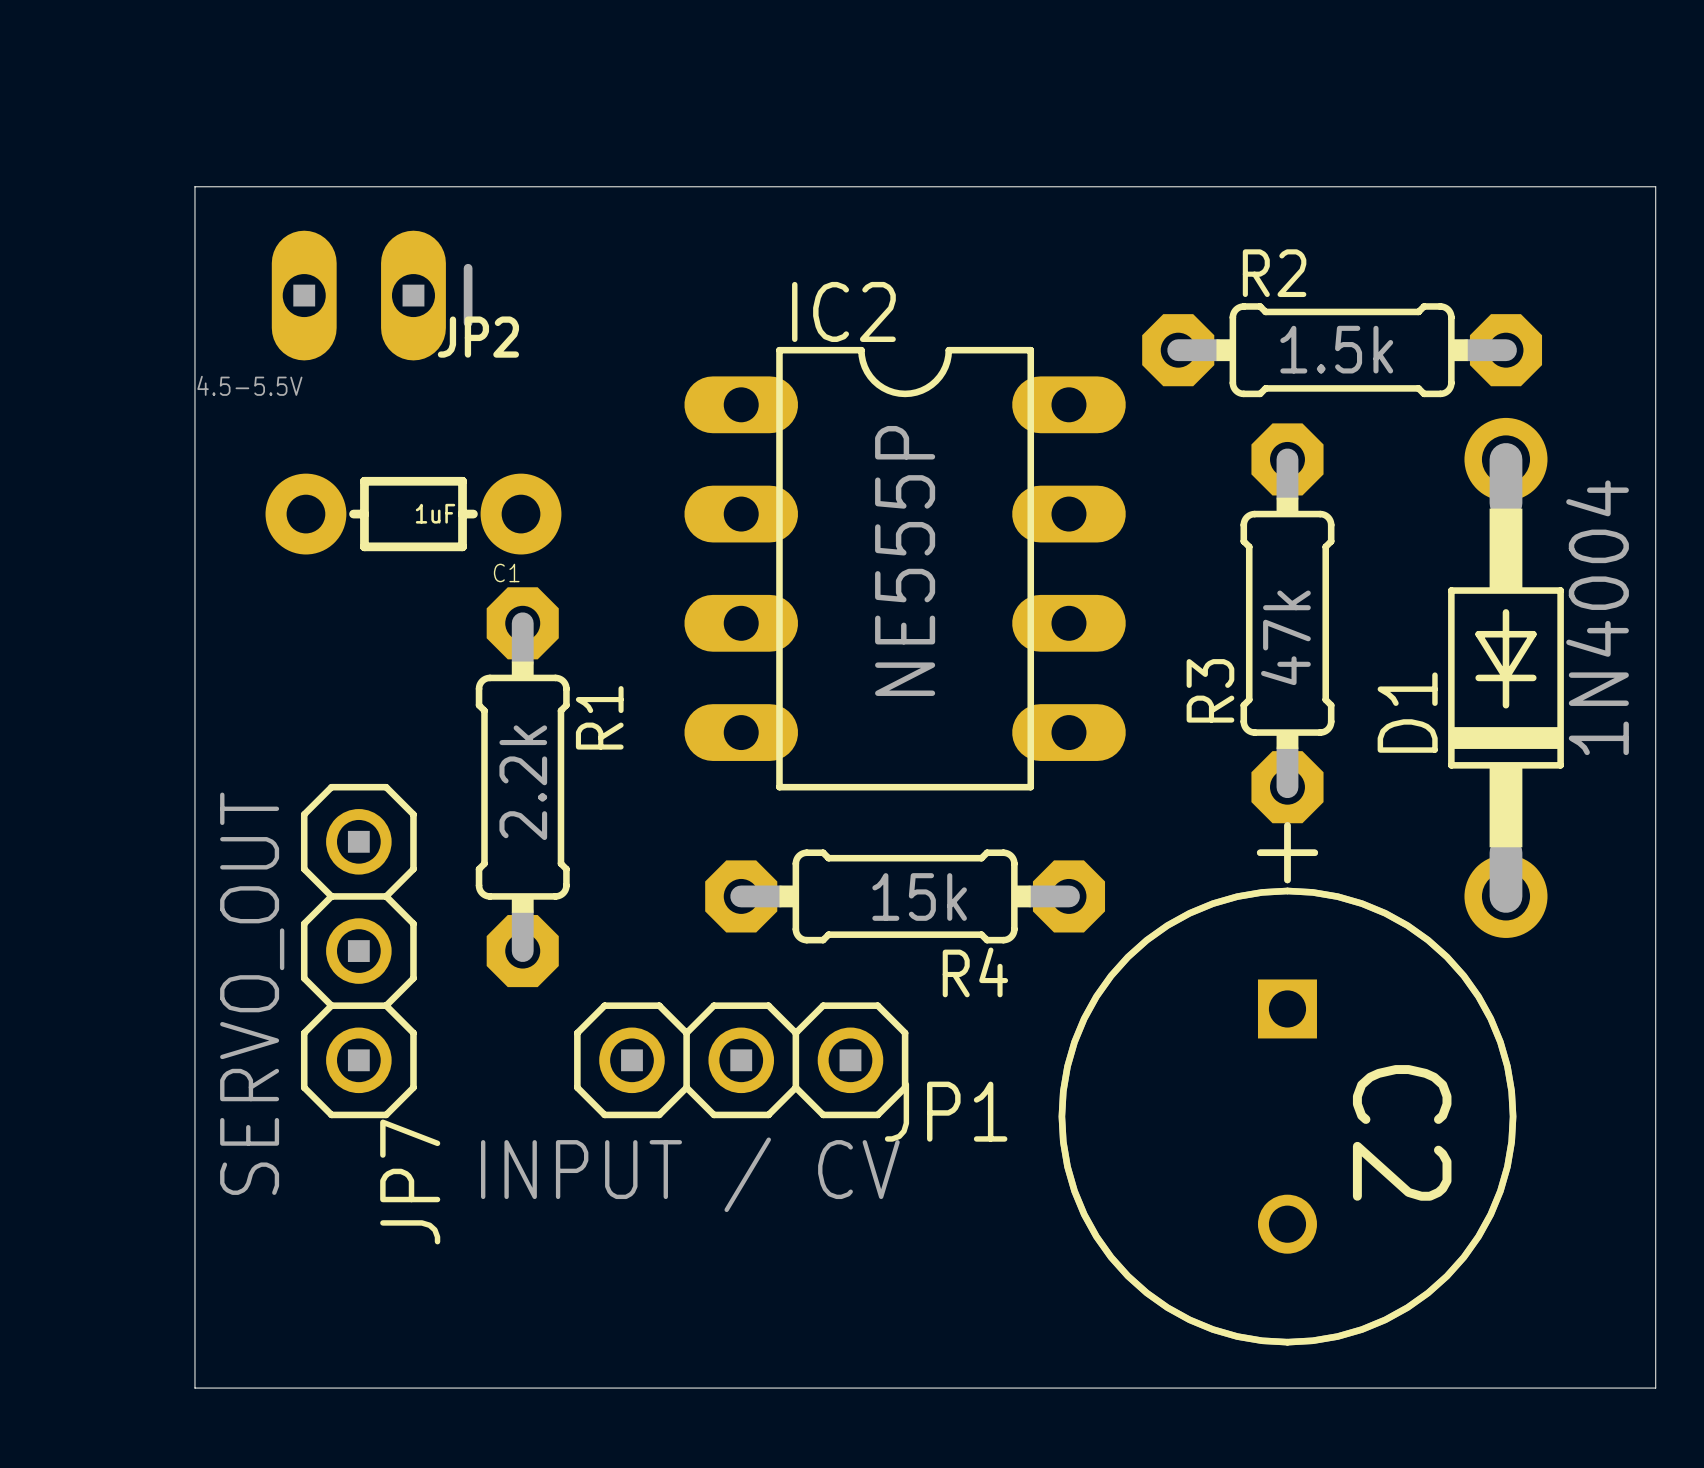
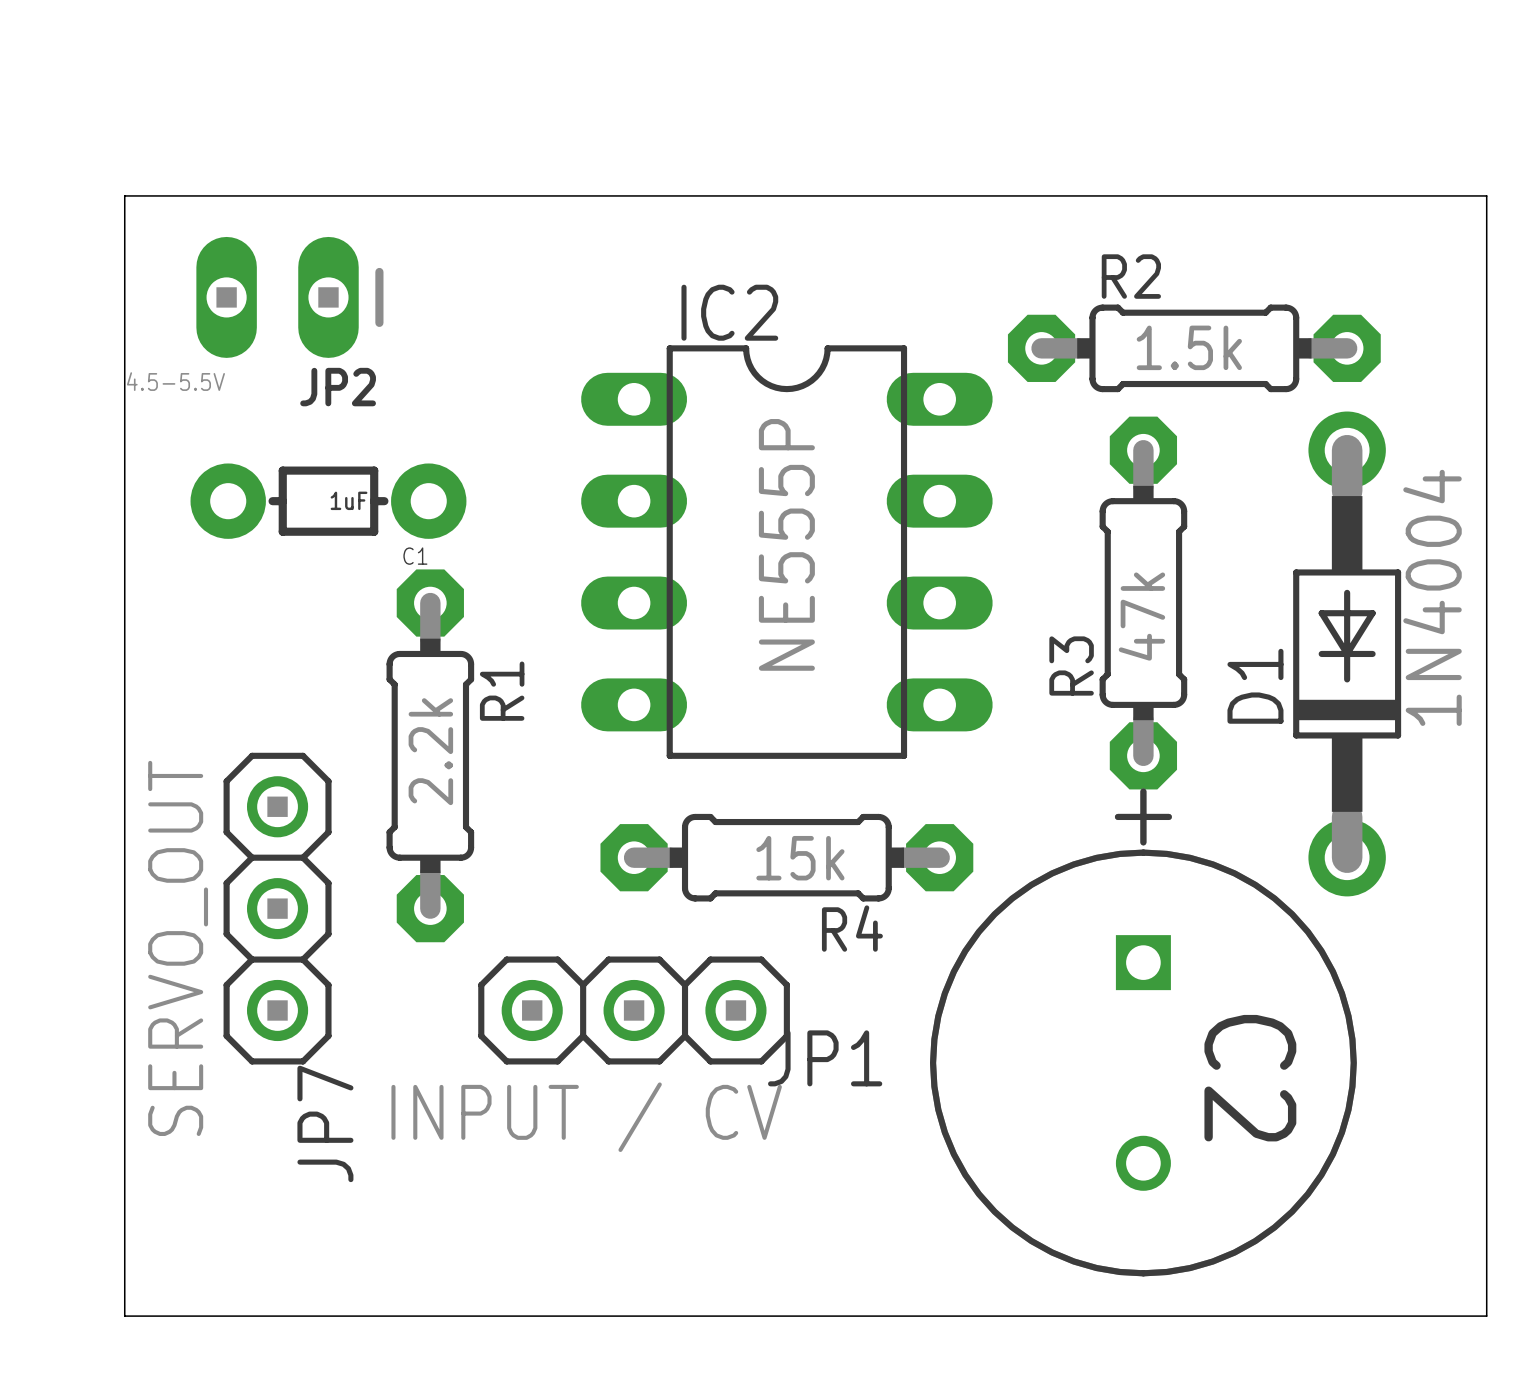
JP2 name position: JP2 (478, 337) -> JP2 (338, 387)

